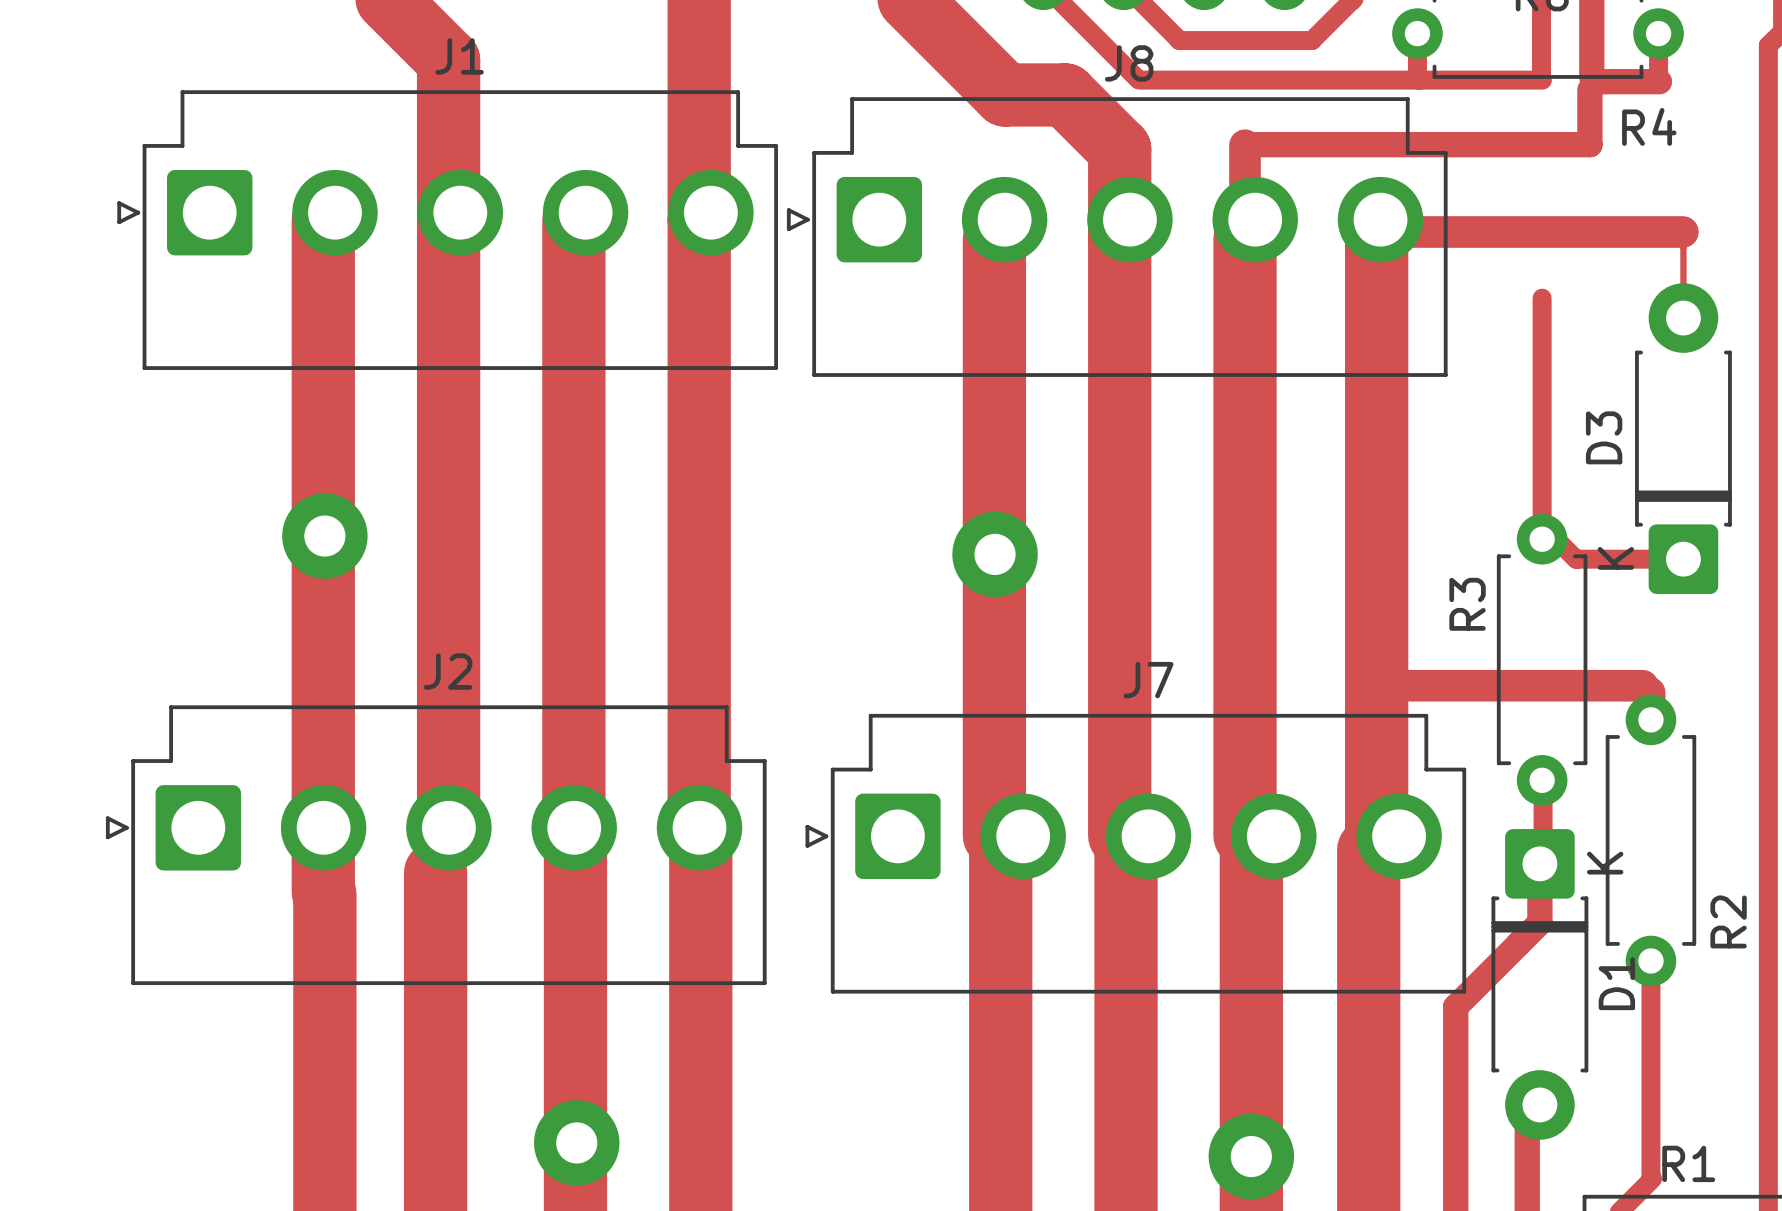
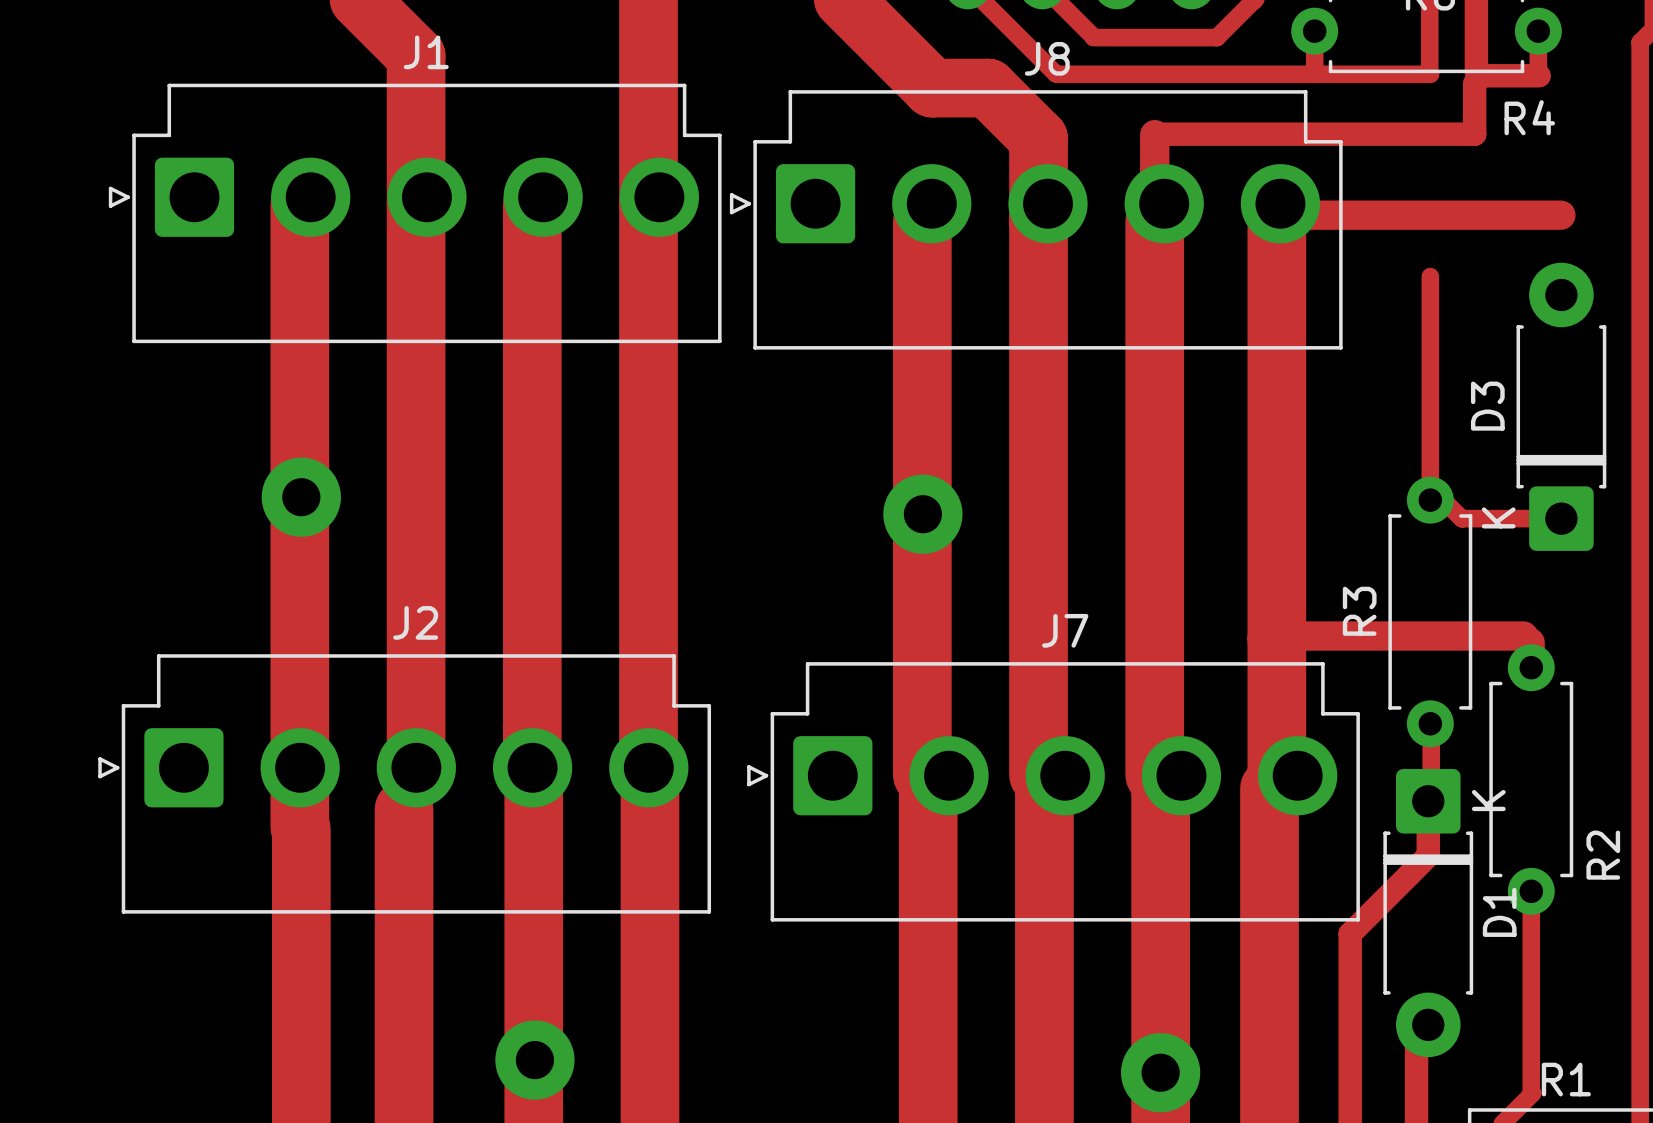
track: (1683, 232) (1683, 318) -> none
R3 name position: R3 (1467, 604) -> R3 (1359, 611)

